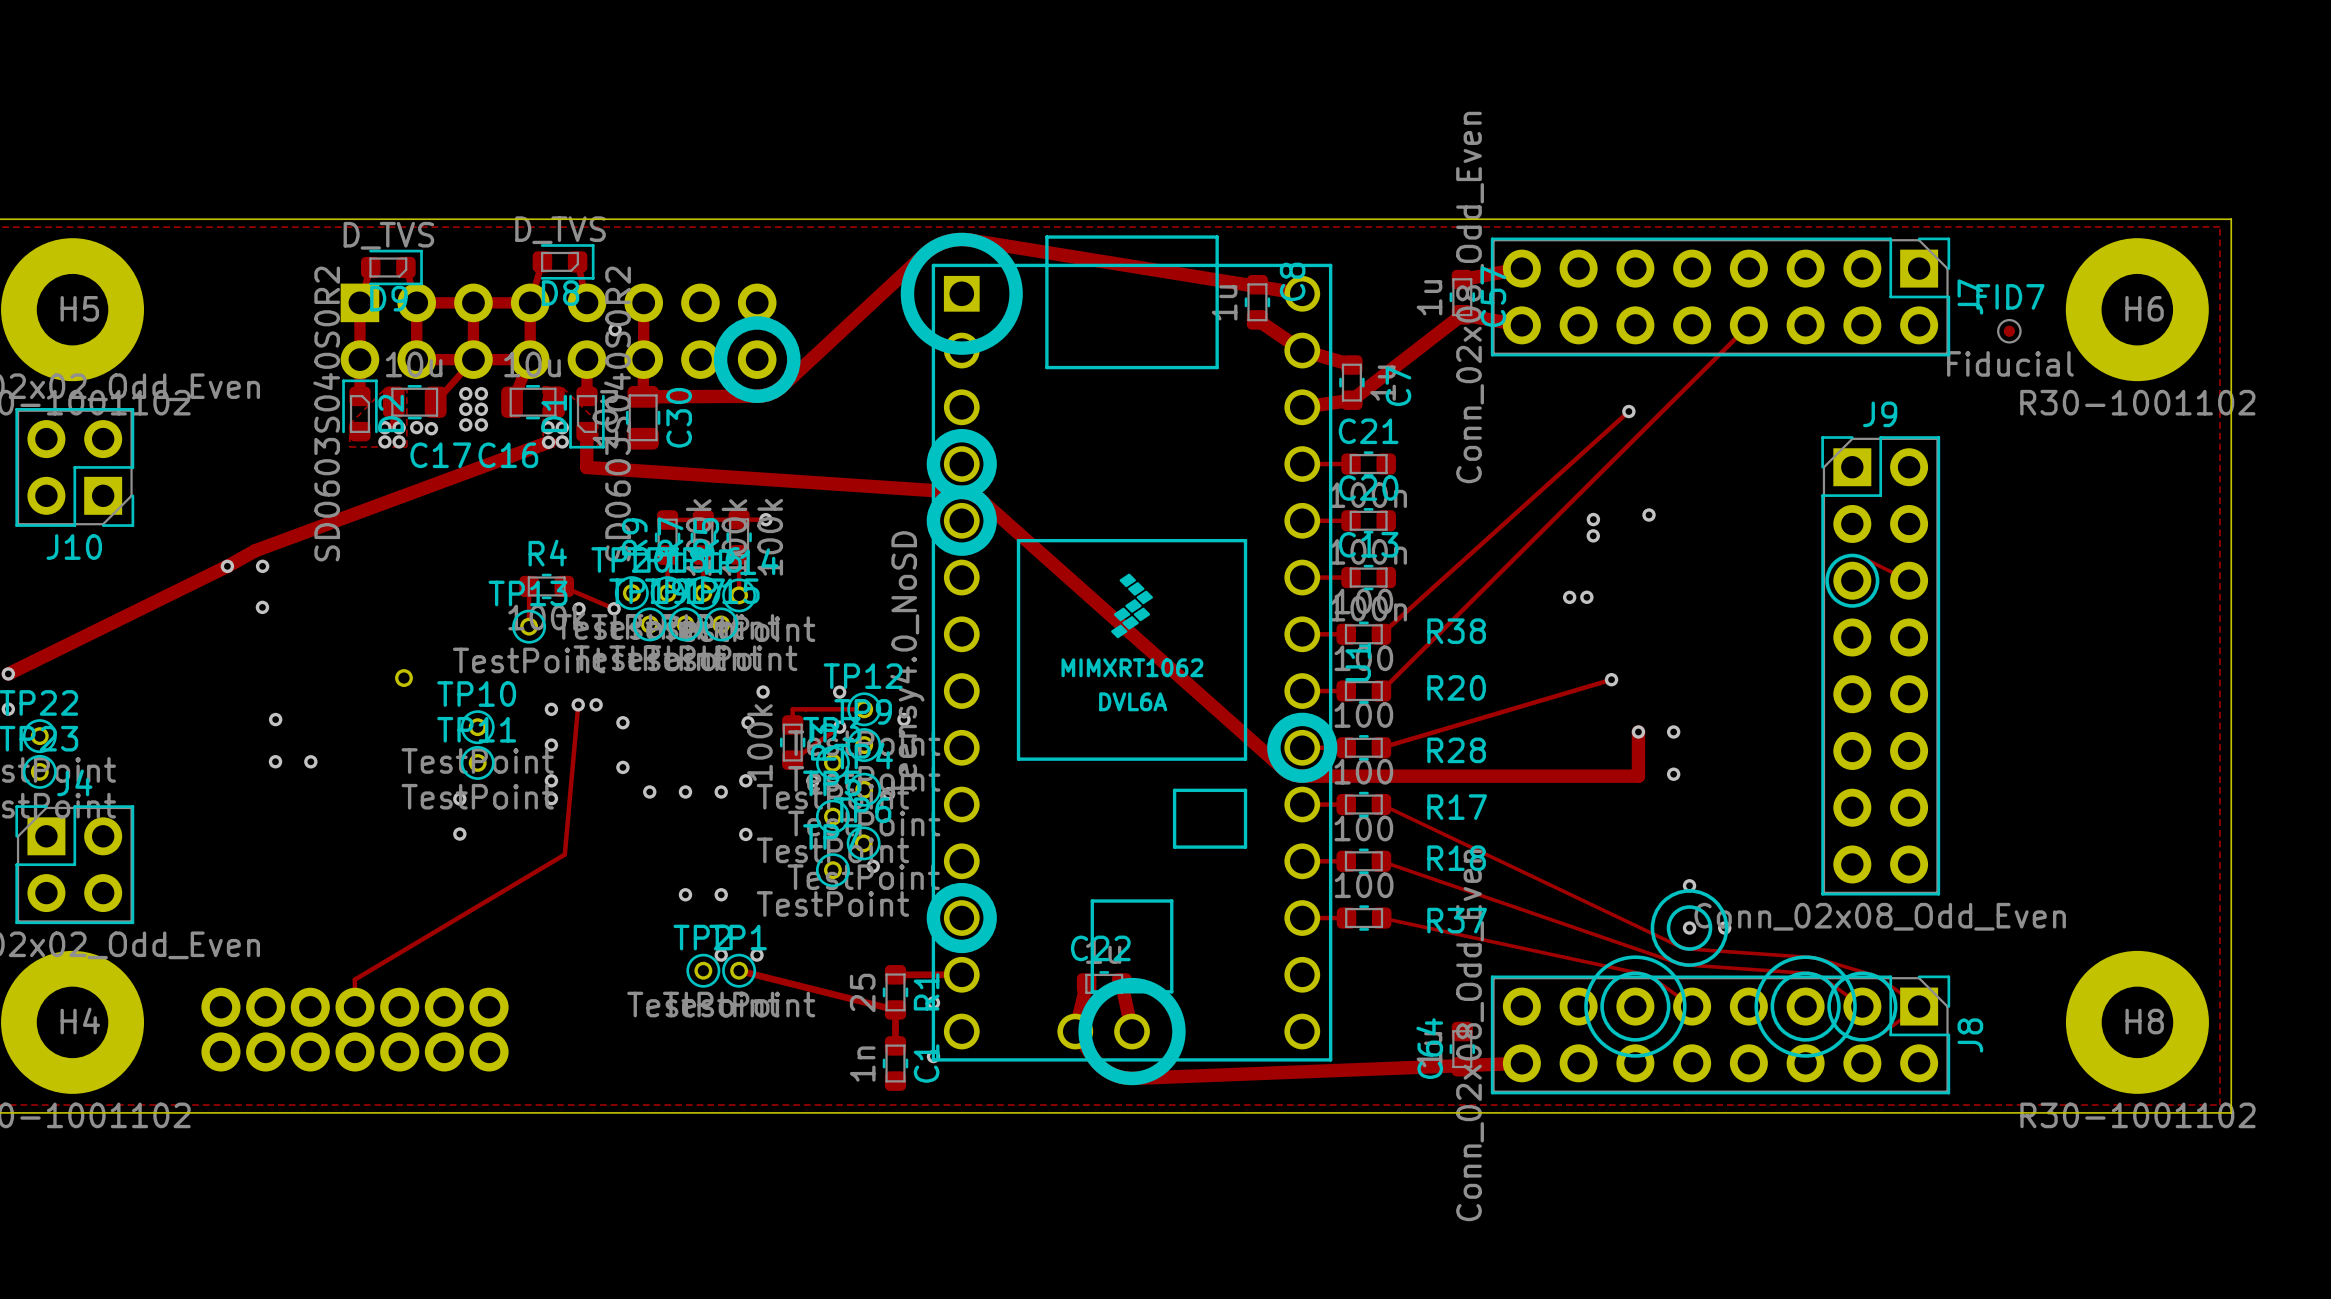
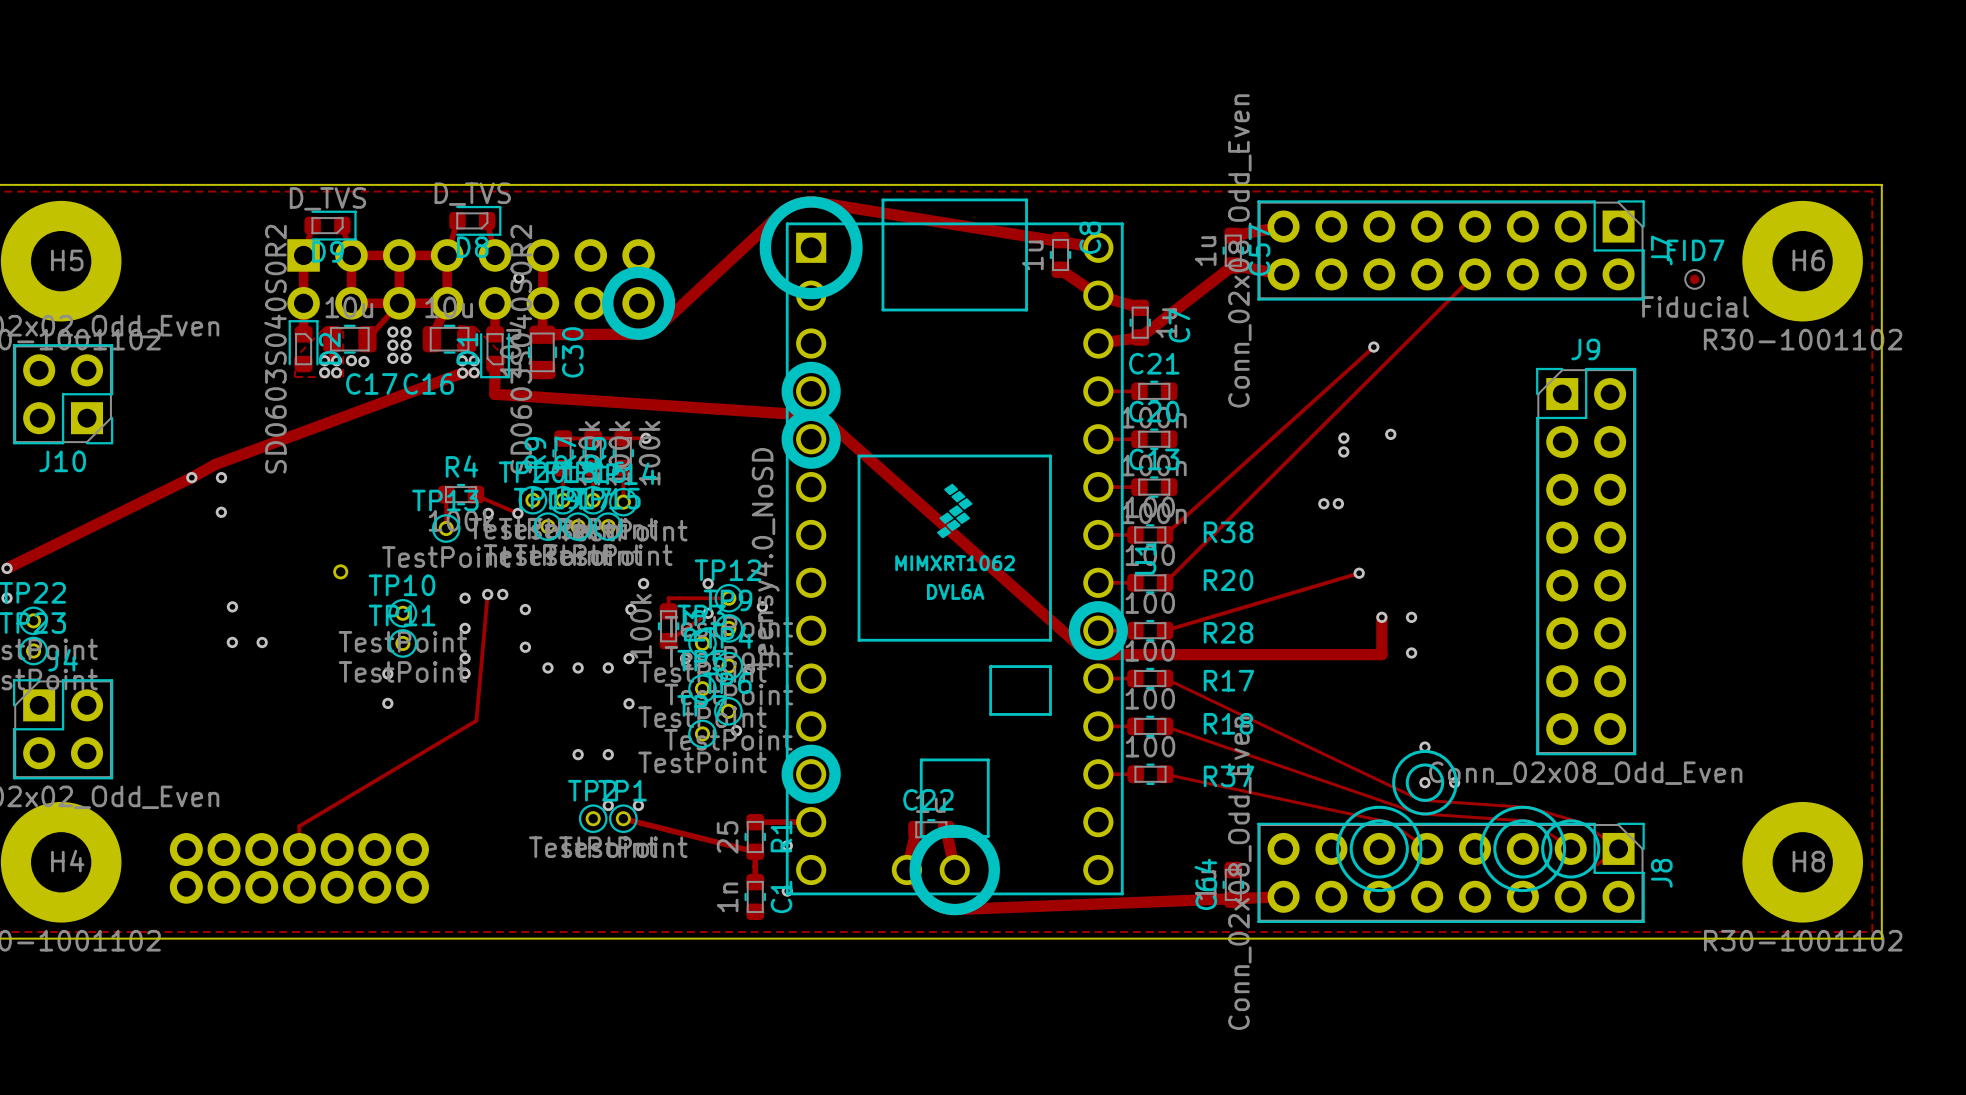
drawing: [1825, 553, 1880, 608] -> none
track: (1863, 558) (1909, 580) -> none

